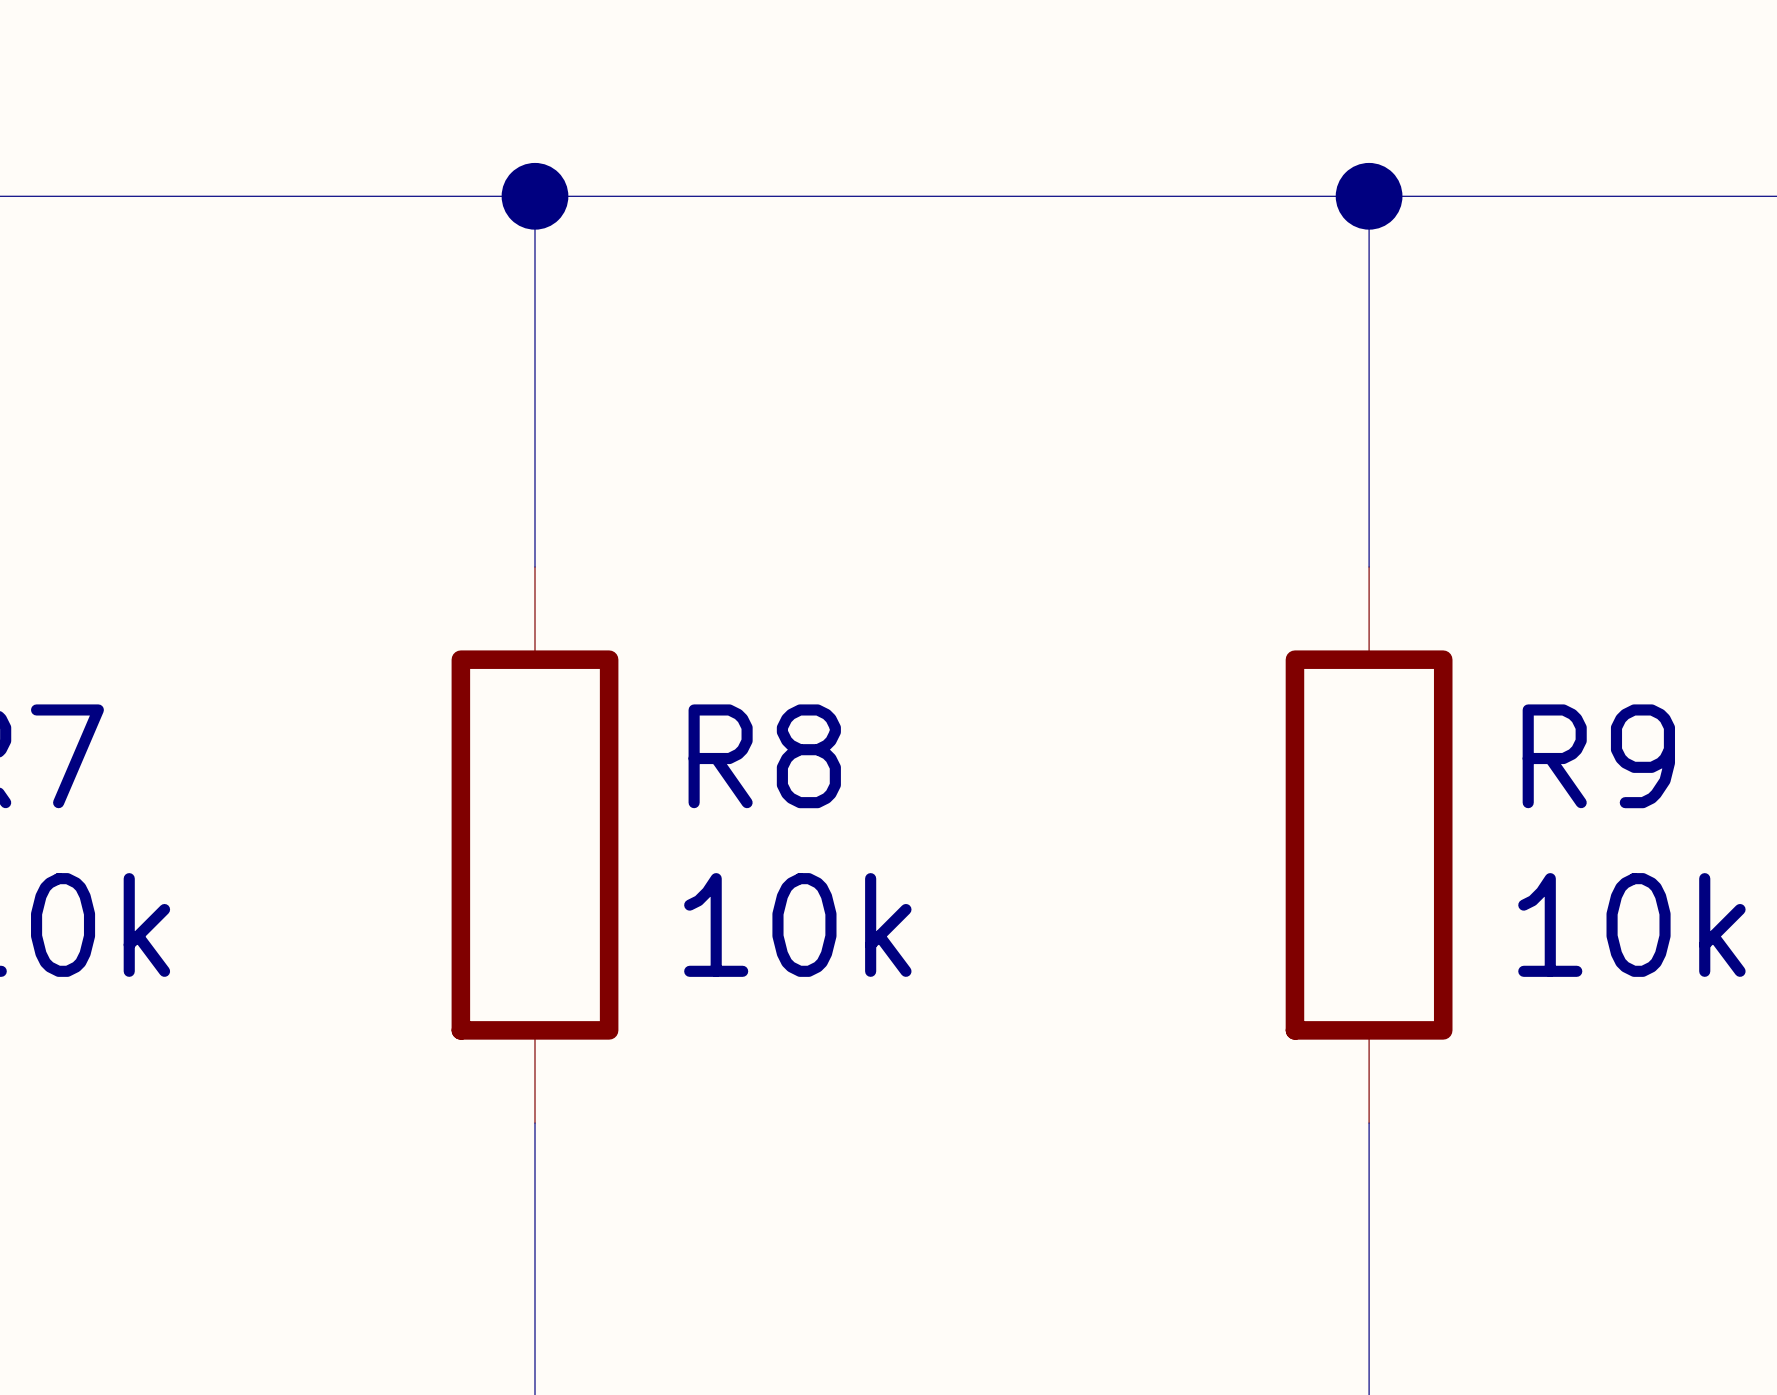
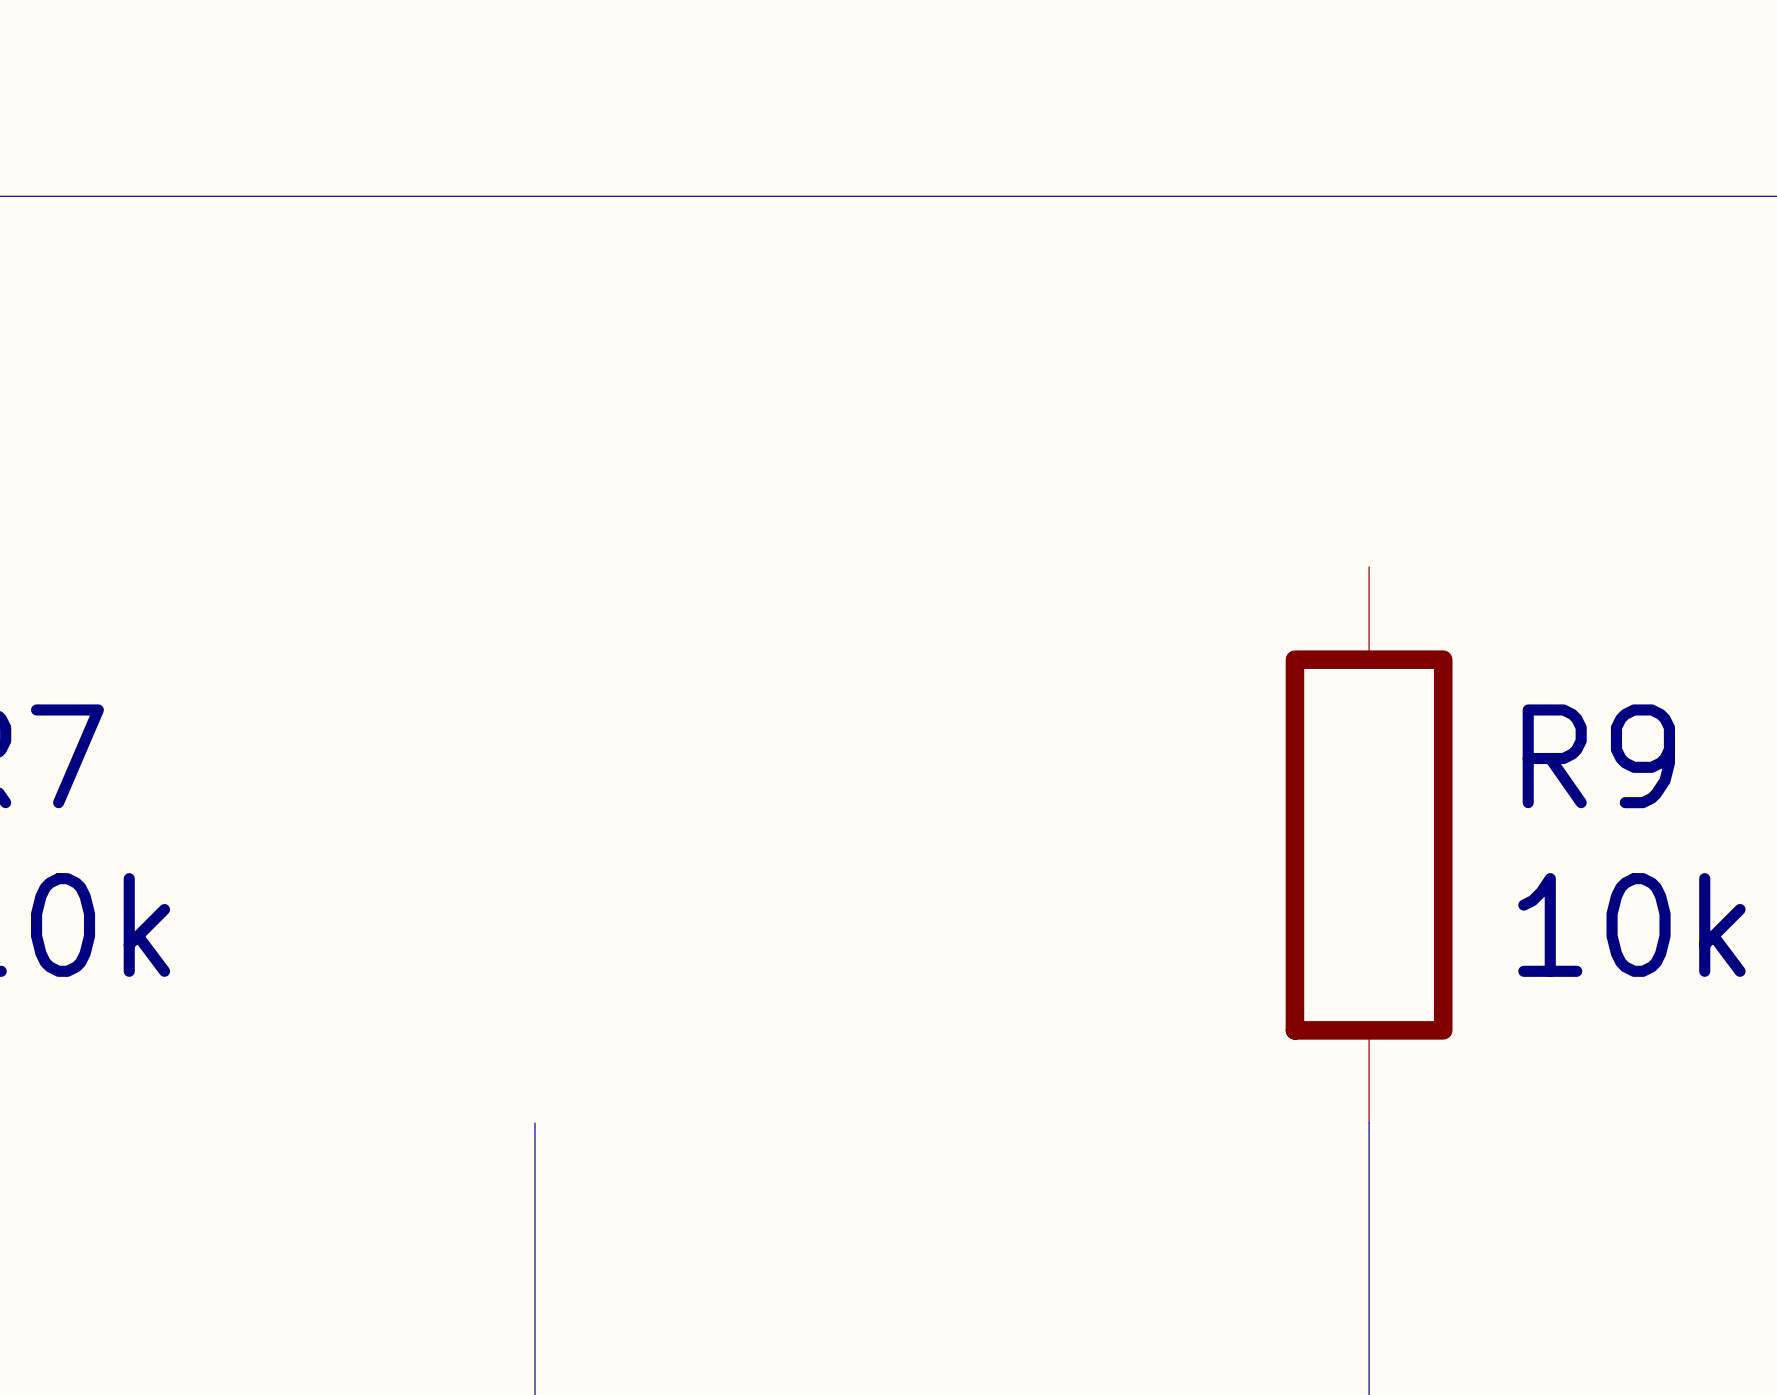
wire: (534, 196) (534, 567) -> none
junction: (534, 196) -> none
wire: (1369, 196) (1369, 567) -> none
junction: (1369, 196) -> none
R8: 10k (534, 845) -> none

